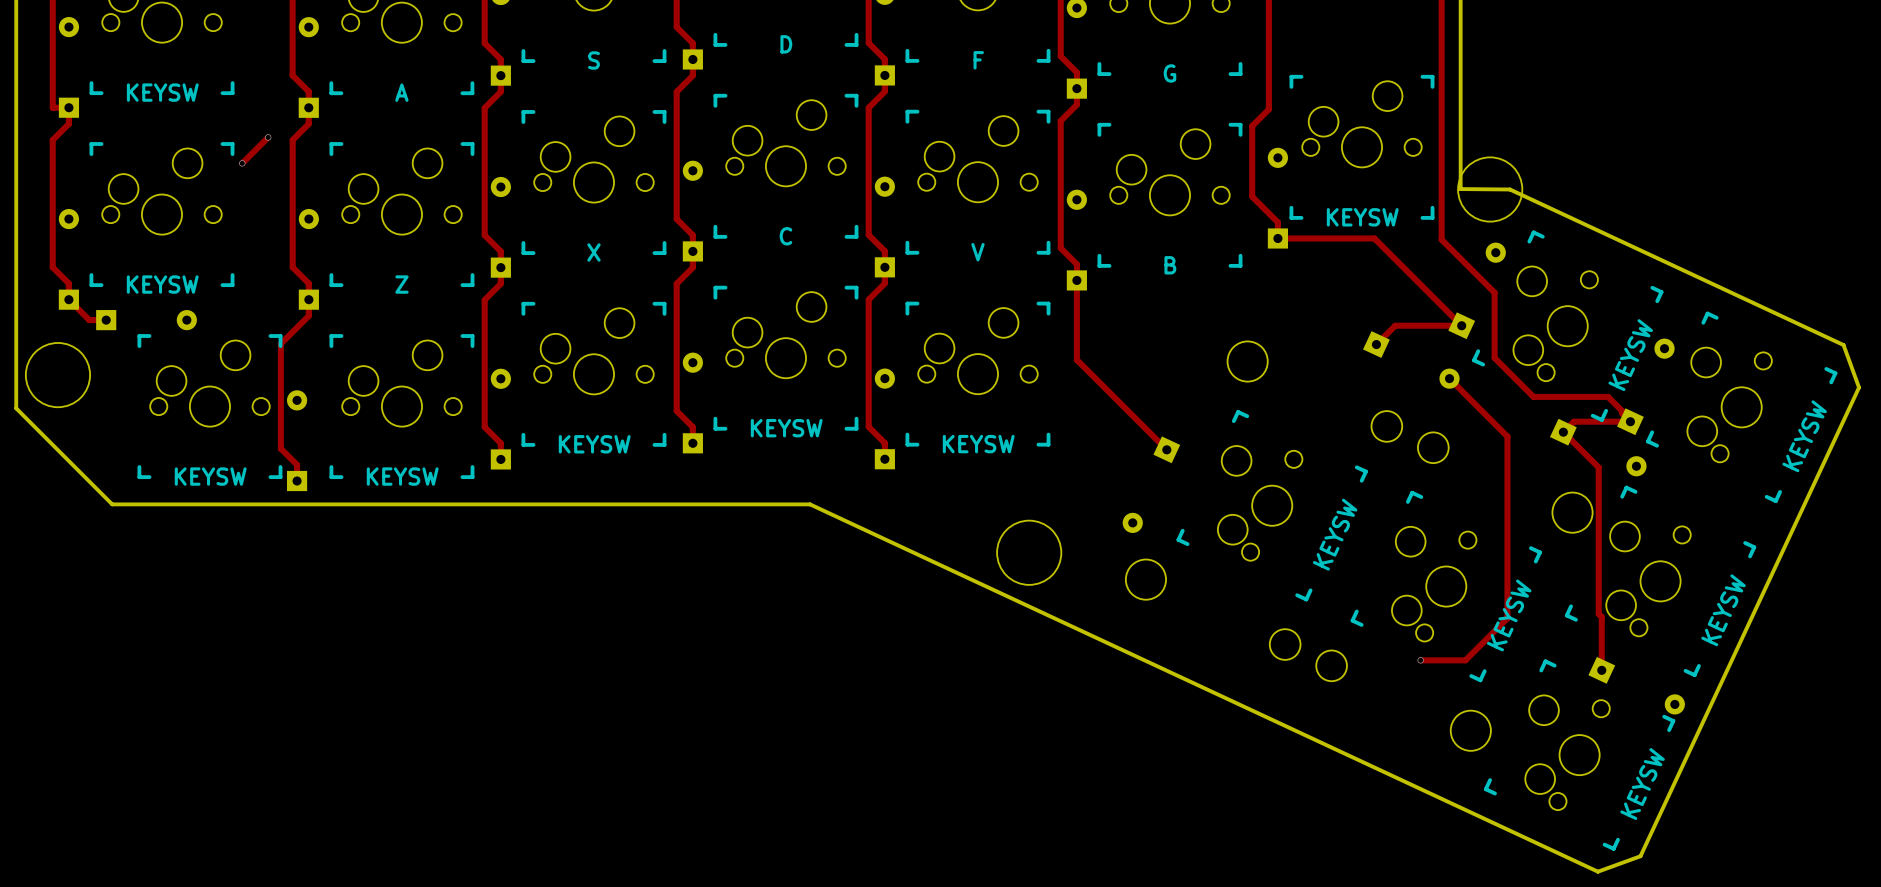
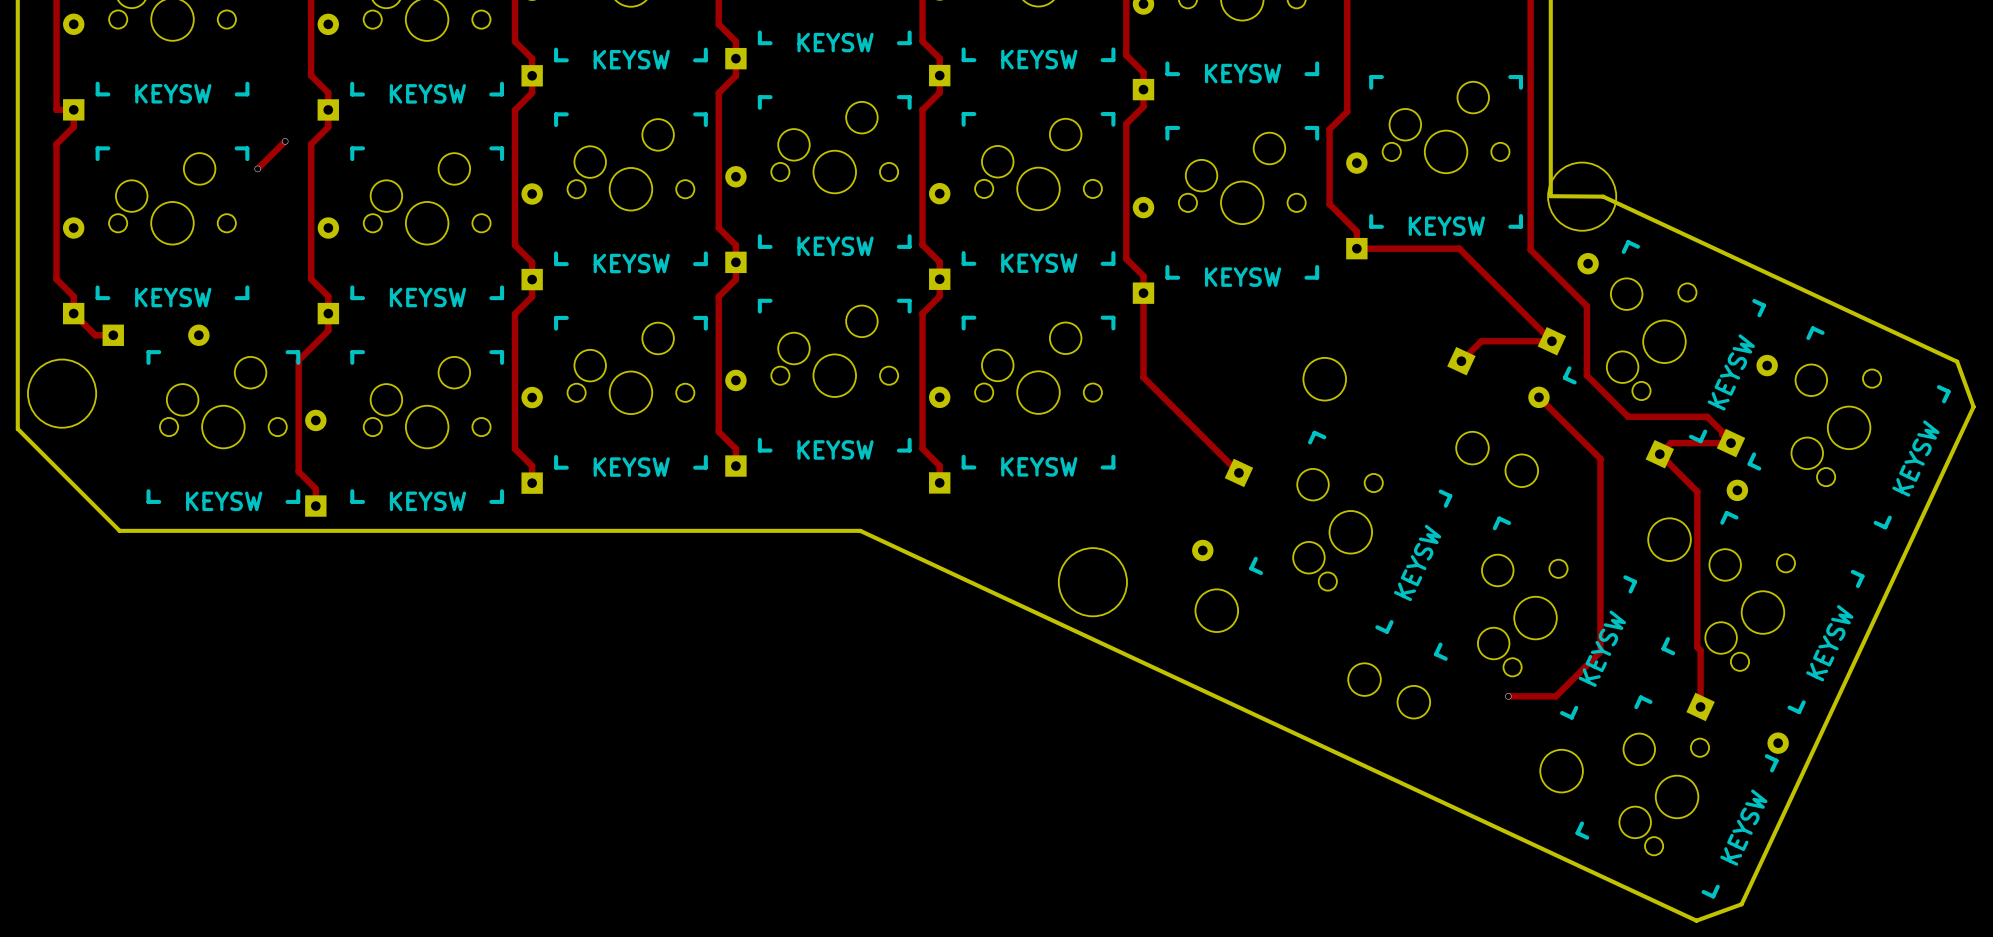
part value: D (786, 44) -> KEYSW (835, 42)
part value: S (593, 60) -> KEYSW (631, 59)
part value: F (978, 60) -> KEYSW (1039, 59)
part value: G (1169, 73) -> KEYSW (1243, 73)
part value: A (401, 92) -> KEYSW (427, 93)
part value: C (785, 236) -> KEYSW (835, 246)
part value: X (593, 252) -> KEYSW (631, 263)
part value: V (977, 252) -> KEYSW (1039, 263)
part value: B (1170, 265) -> KEYSW (1243, 277)
part value: Z (401, 284) -> KEYSW (427, 297)

